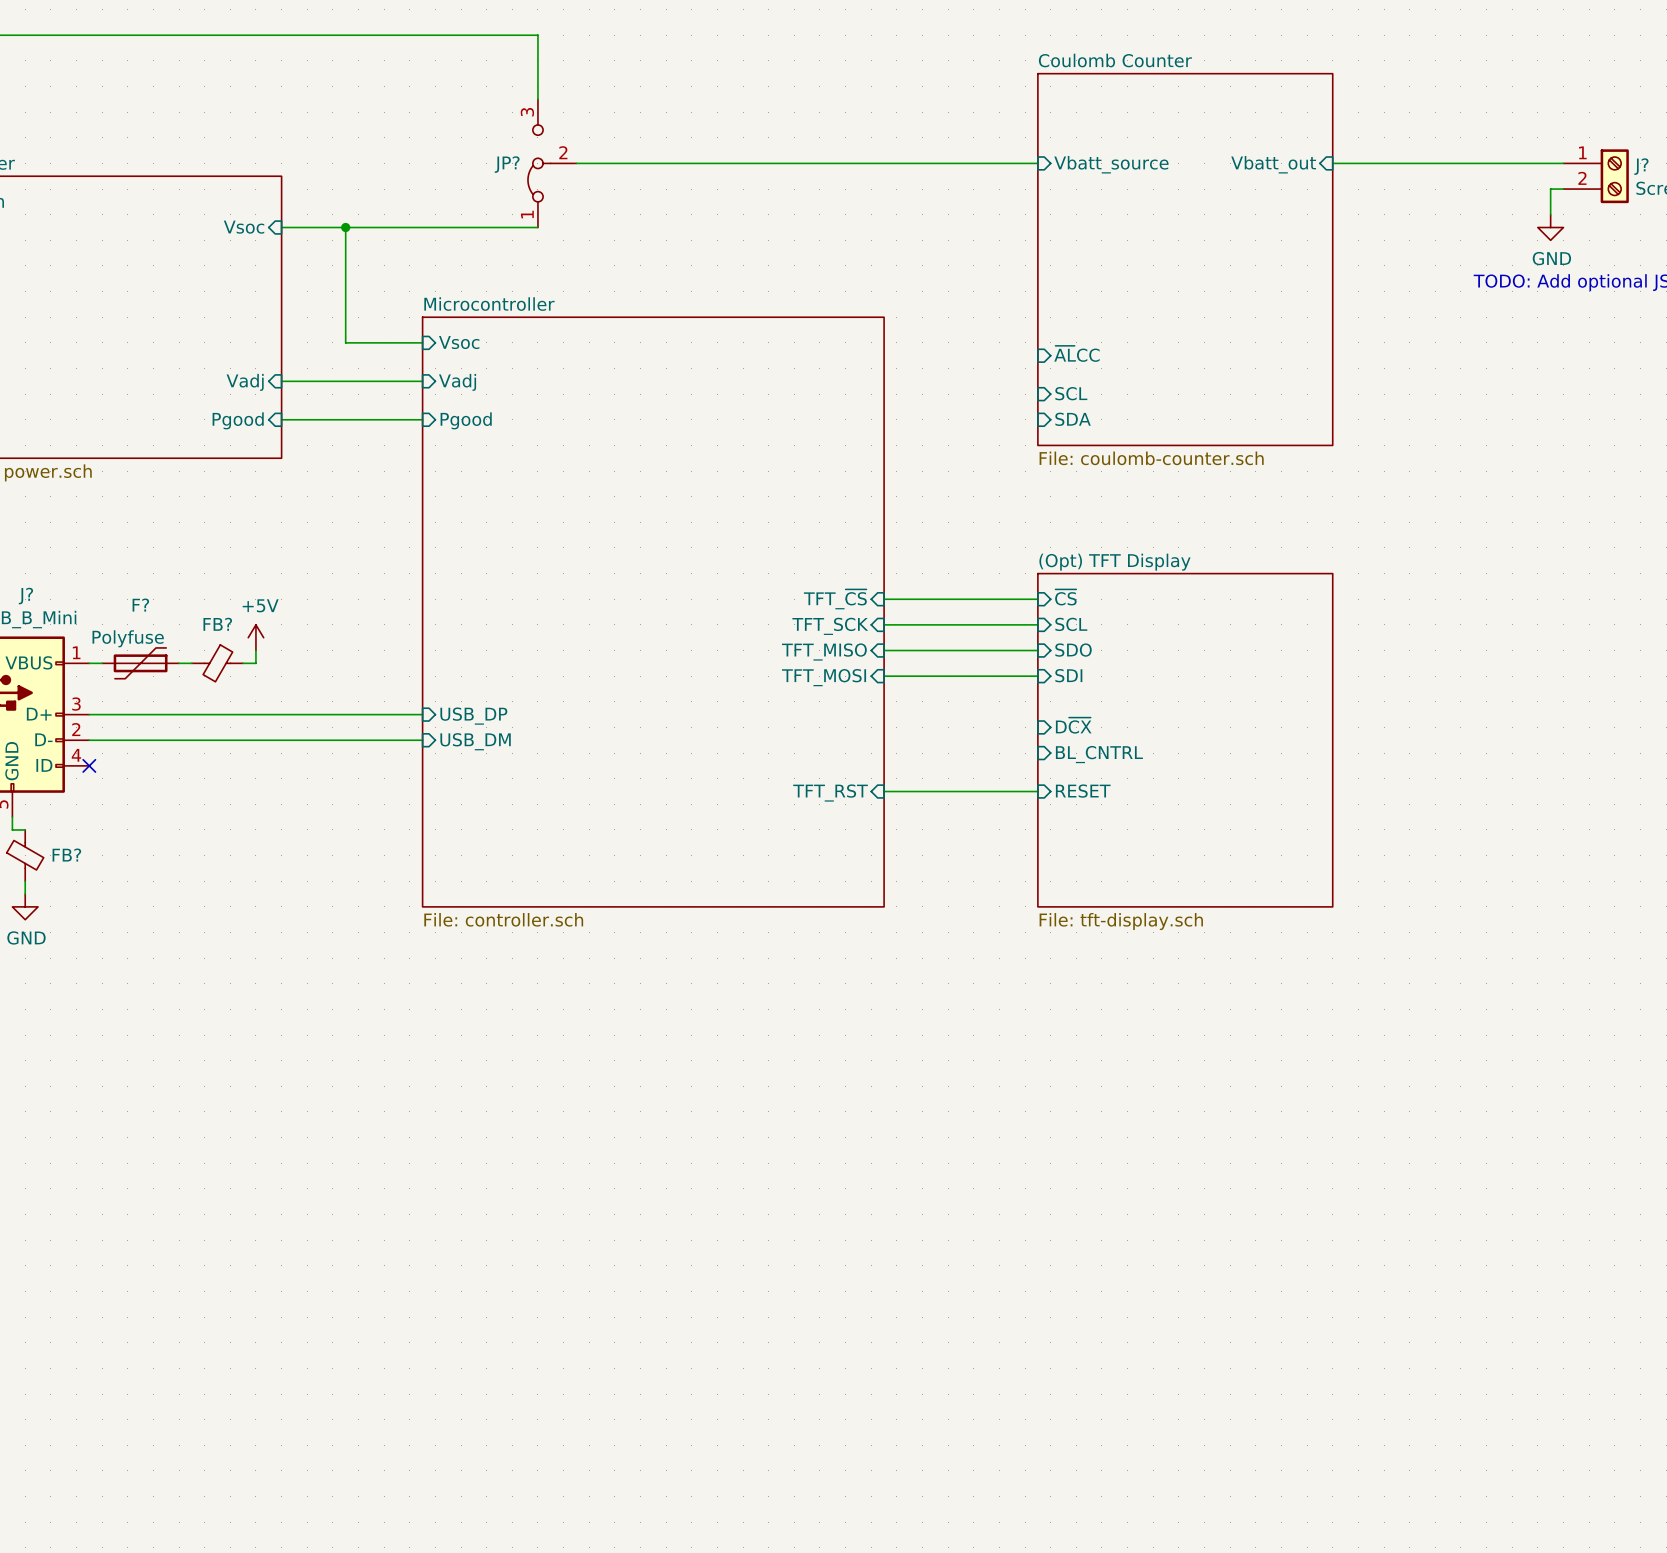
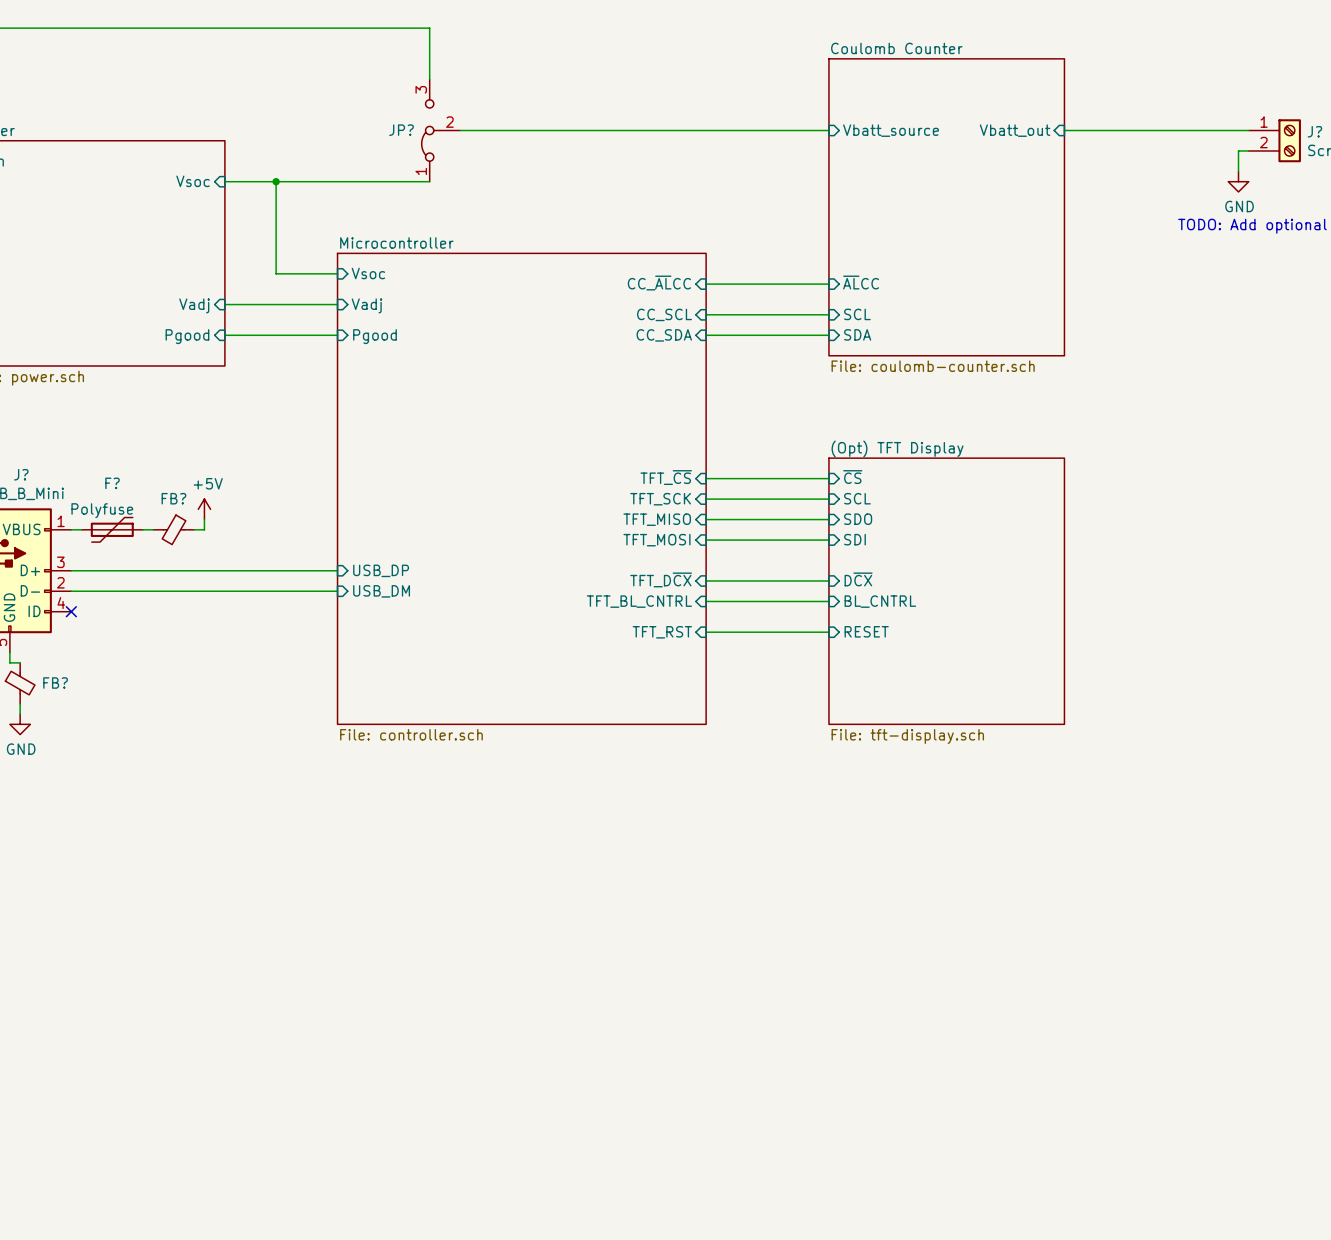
sheet pin: none -> CC_~{AL}CC (659, 283)
wire: none -> (706, 284) (828, 284)
wire: none -> (706, 314) (828, 314)
sheet pin: none -> CC_SCL (664, 314)
wire: none -> (706, 335) (828, 335)
sheet pin: none -> CC_SDA (664, 335)
sheet pin: none -> TFT_D~{CX} (661, 579)
wire: none -> (706, 581) (828, 581)
wire: none -> (706, 601) (828, 601)
sheet pin: none -> TFT_BL_CNTRL (639, 601)

